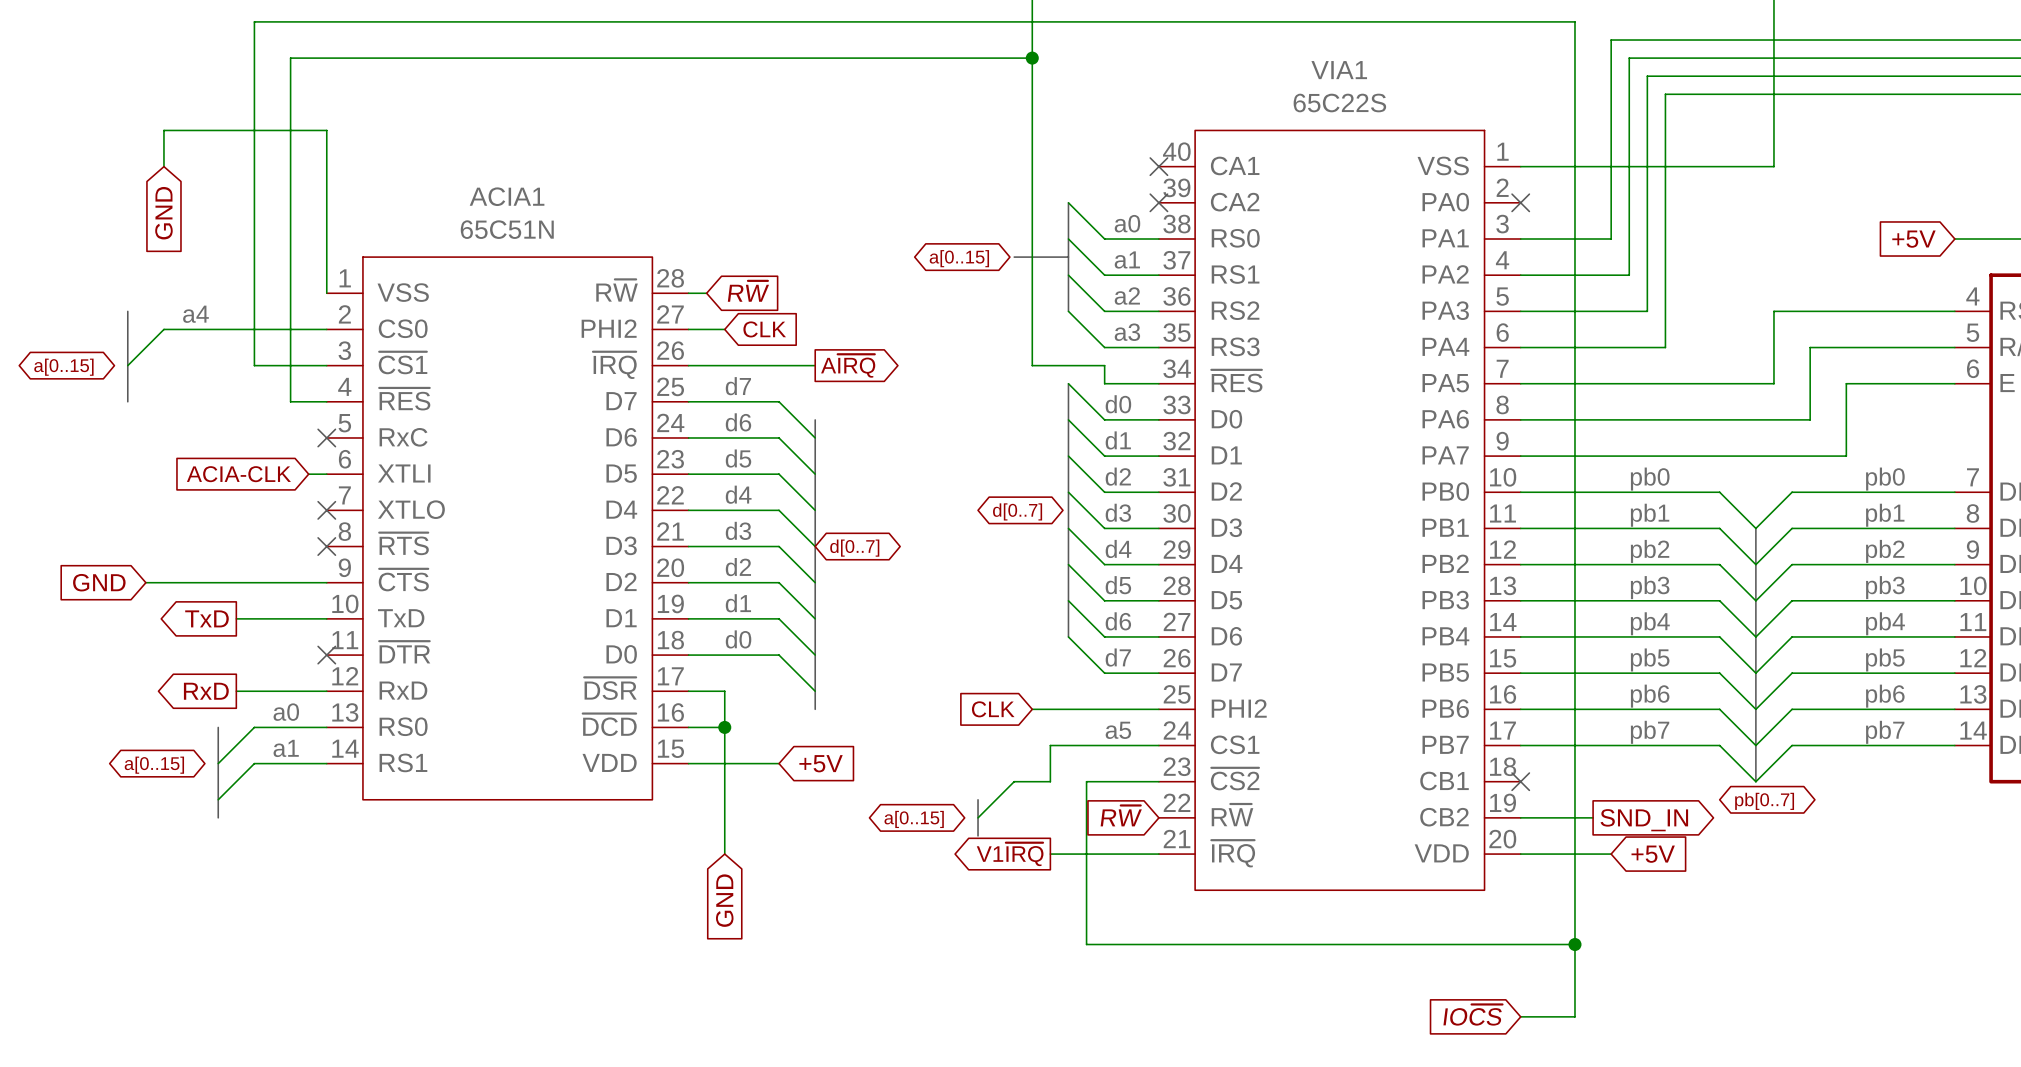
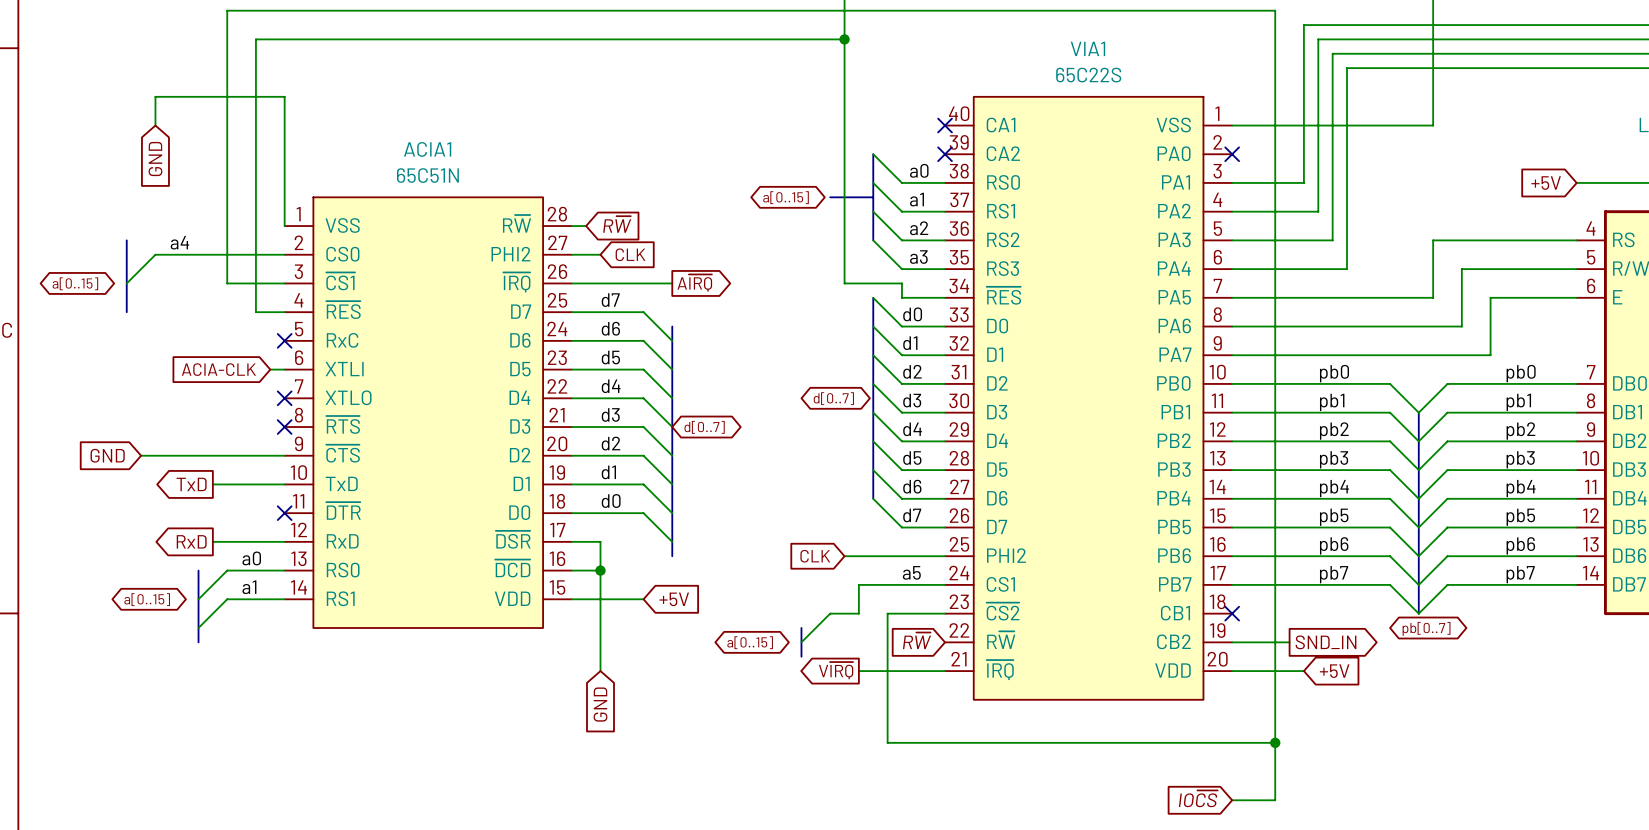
global label: V1~{IRQ} (1010, 854) -> V~{IRQ} (836, 670)

